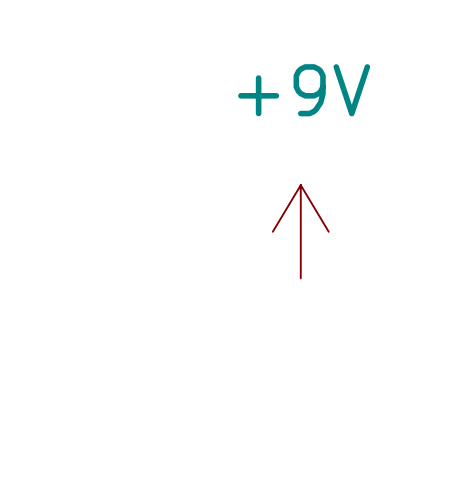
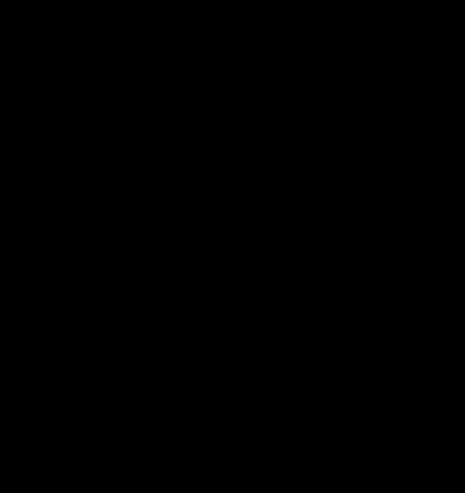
power symbol: +9V (300, 231) -> none

